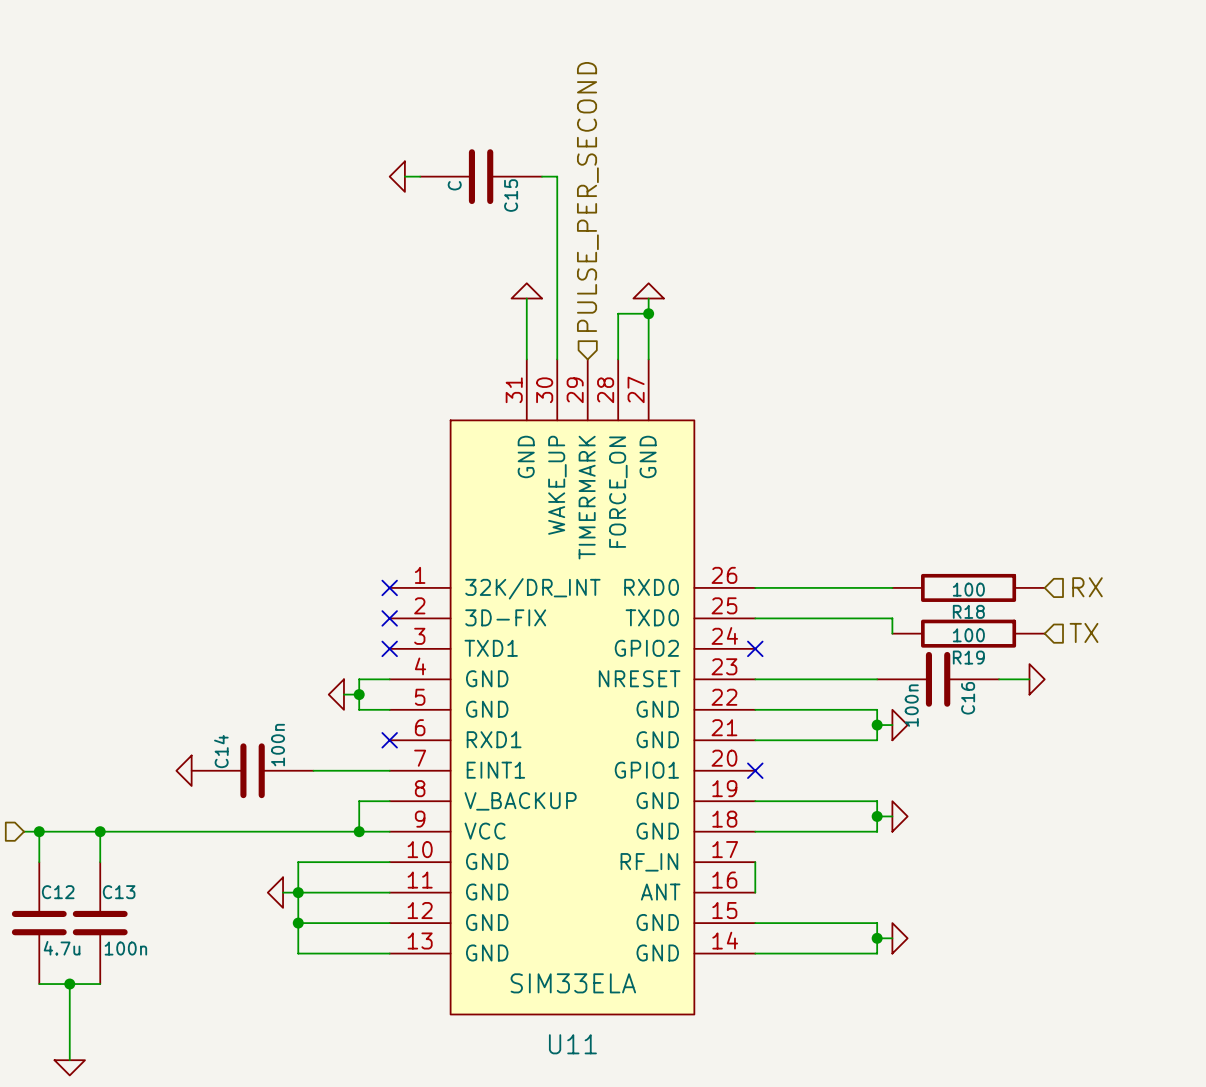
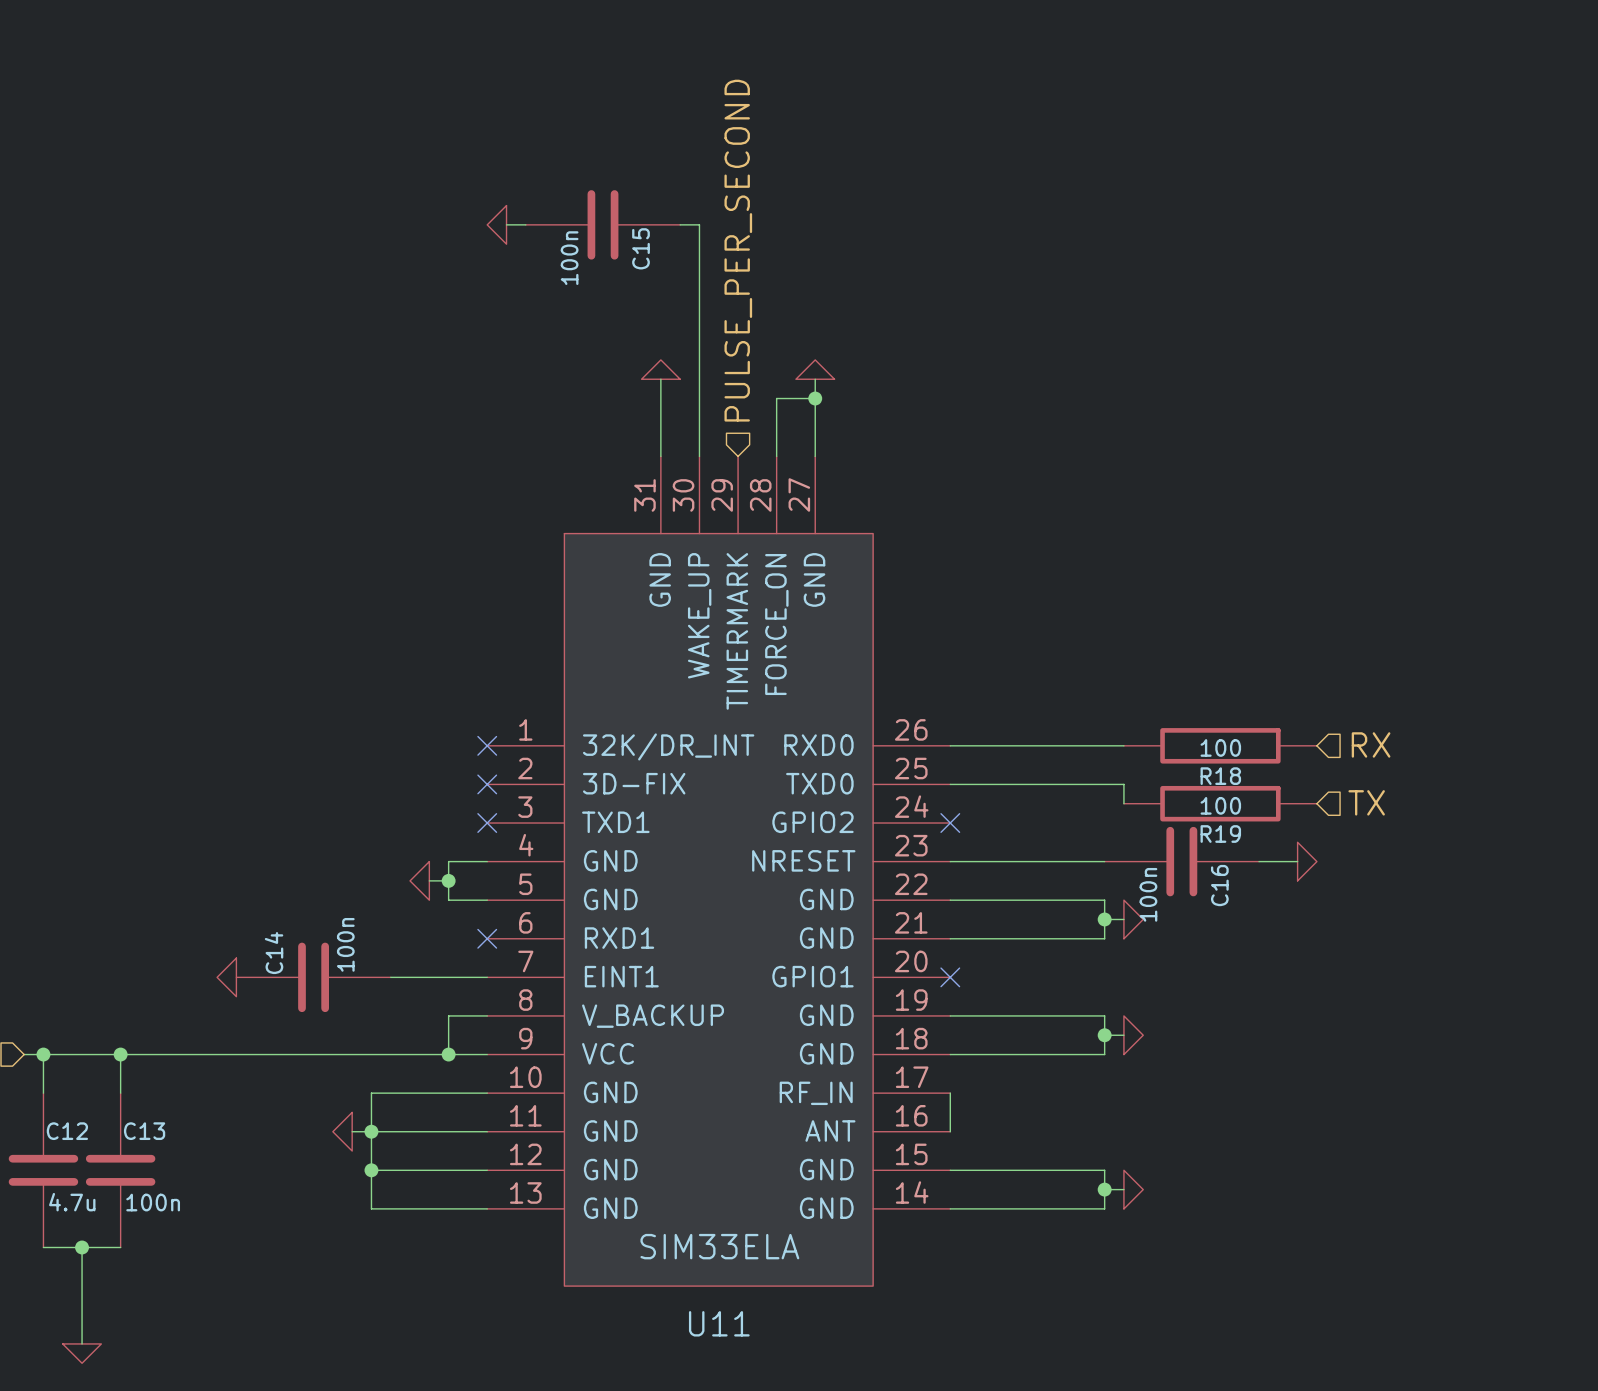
C15 value: C (454, 185) -> 100n (569, 258)

